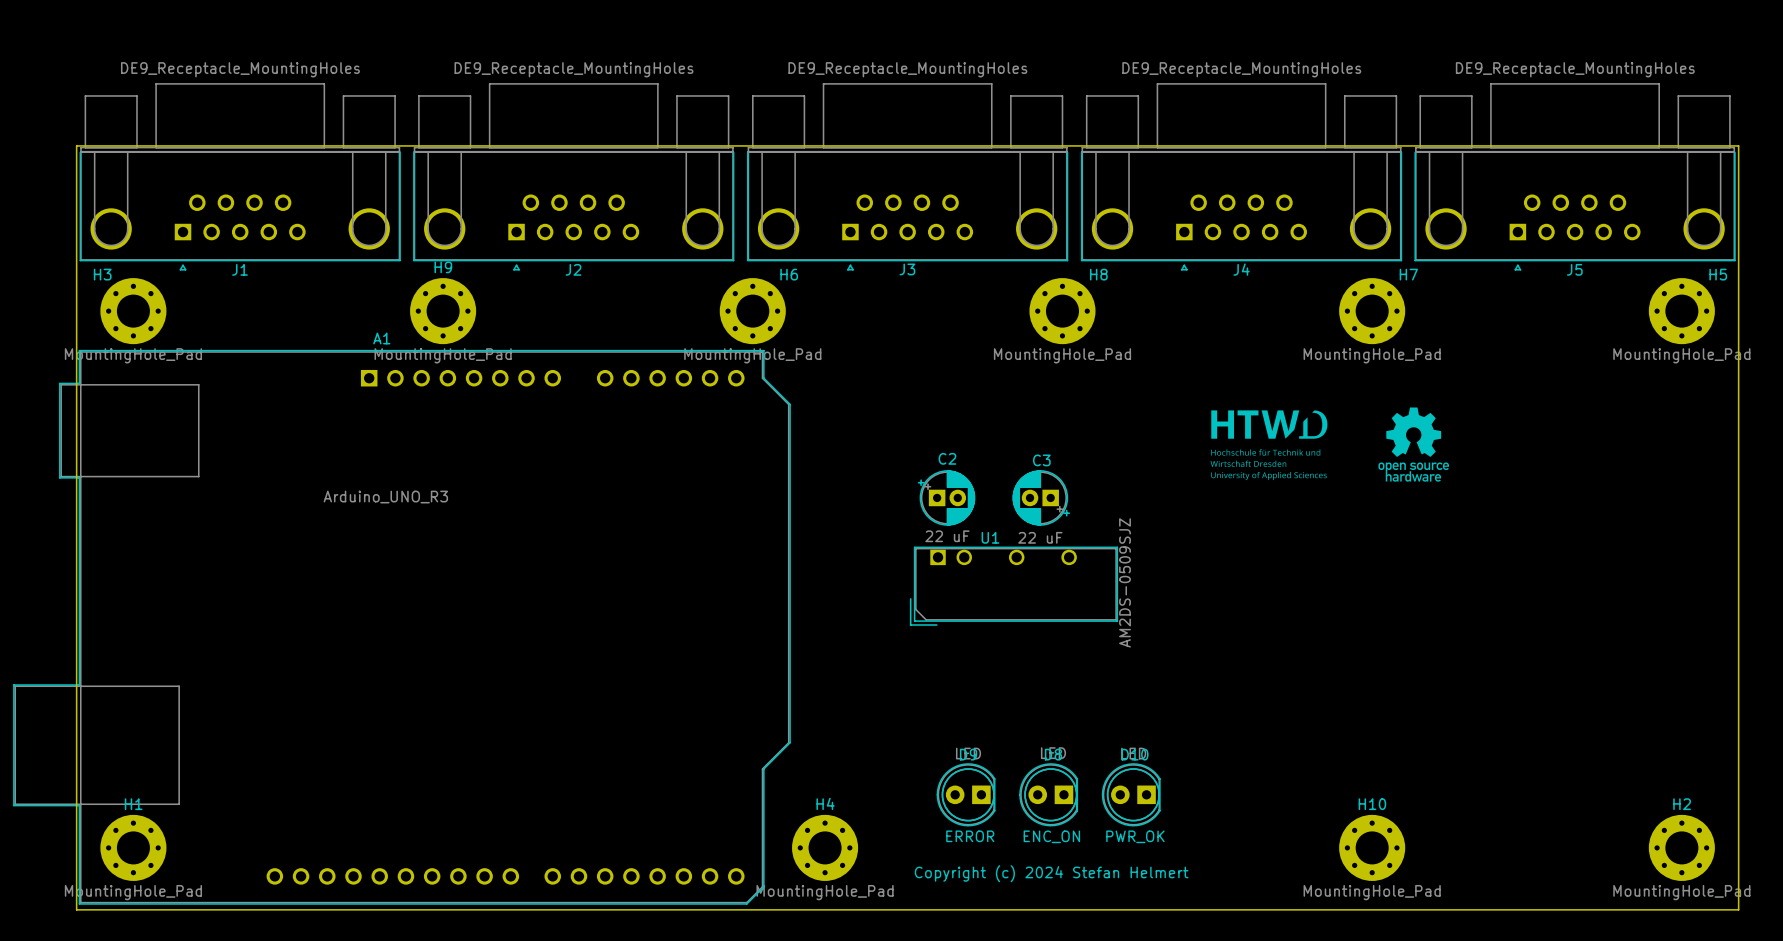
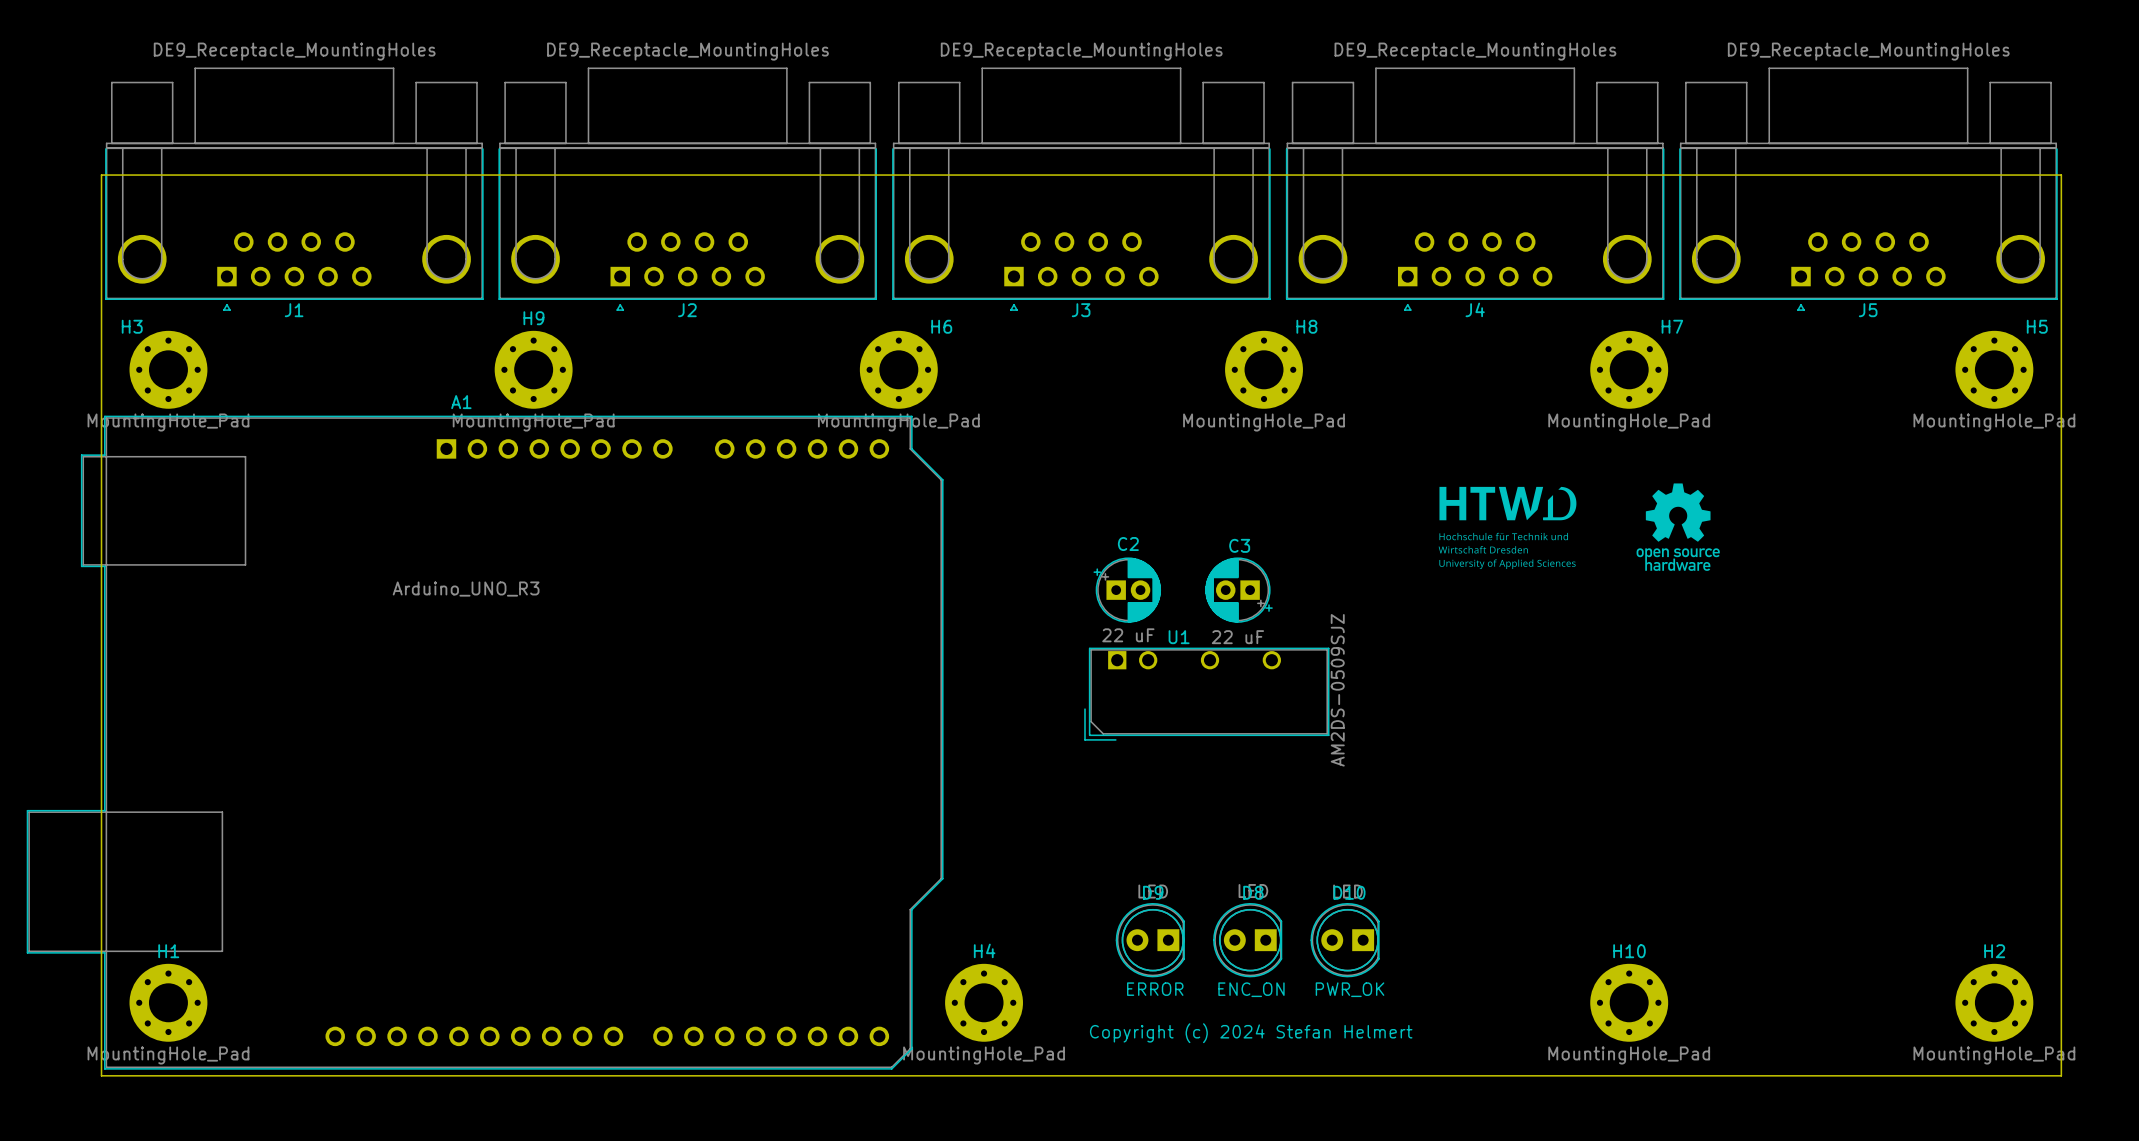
J1 footprint: [79, 83, 401, 271] -> [105, 67, 484, 311]
J2 footprint: [413, 83, 735, 271] -> [498, 67, 877, 311]
J3 footprint: [747, 83, 1069, 271] -> [892, 67, 1271, 311]
J4 footprint: [1081, 83, 1403, 271] -> [1285, 67, 1665, 311]
J5 footprint: [1414, 83, 1736, 271] -> [1679, 67, 2058, 311]

